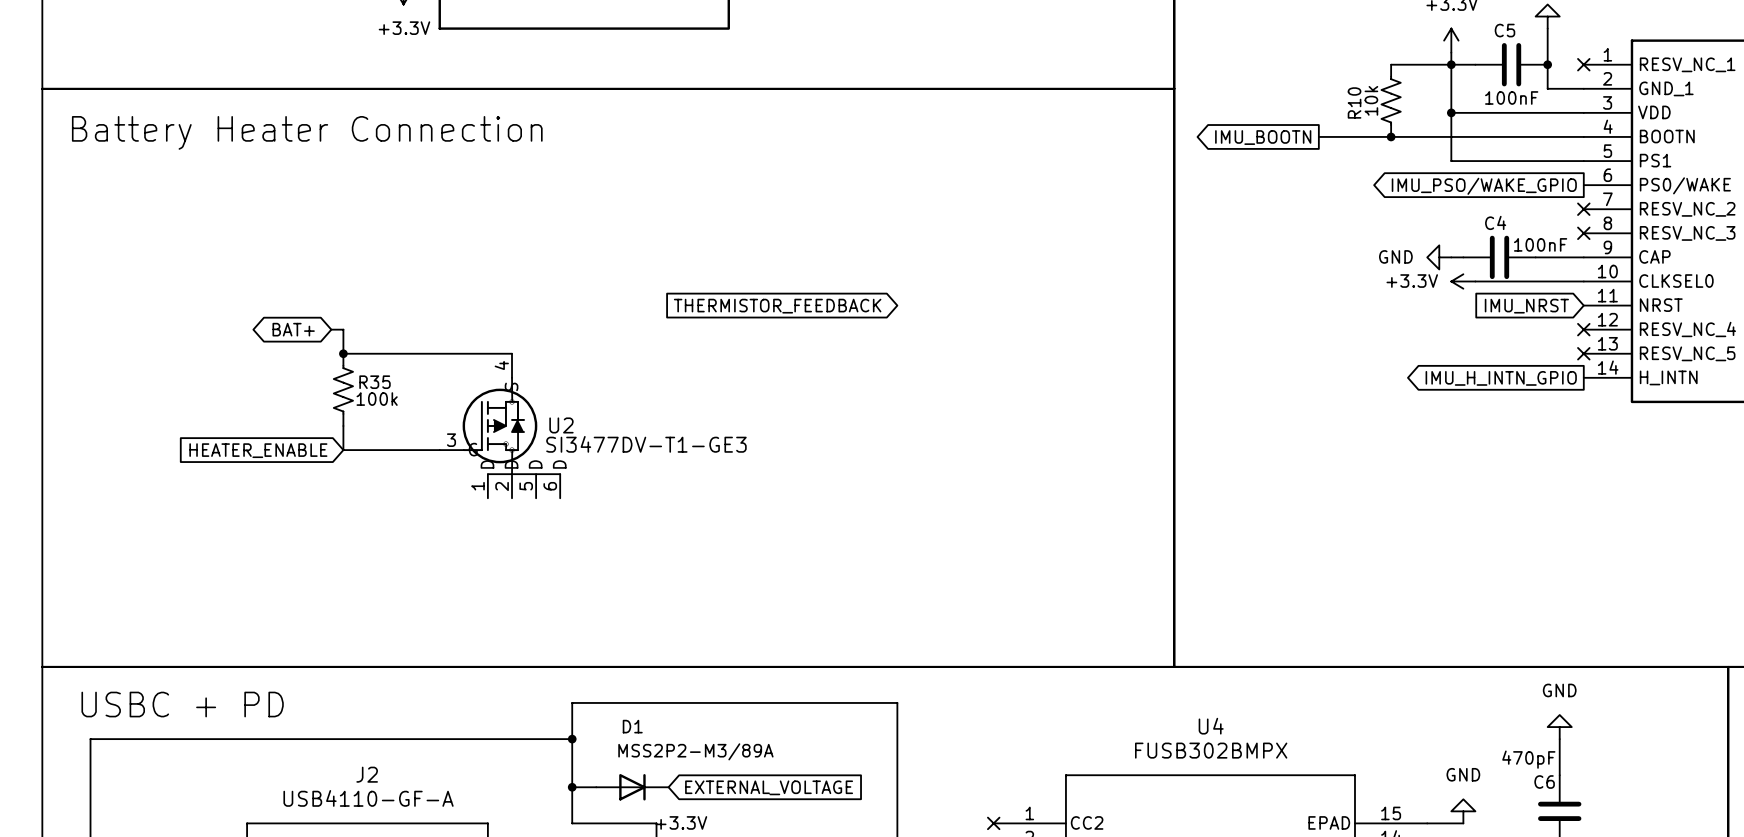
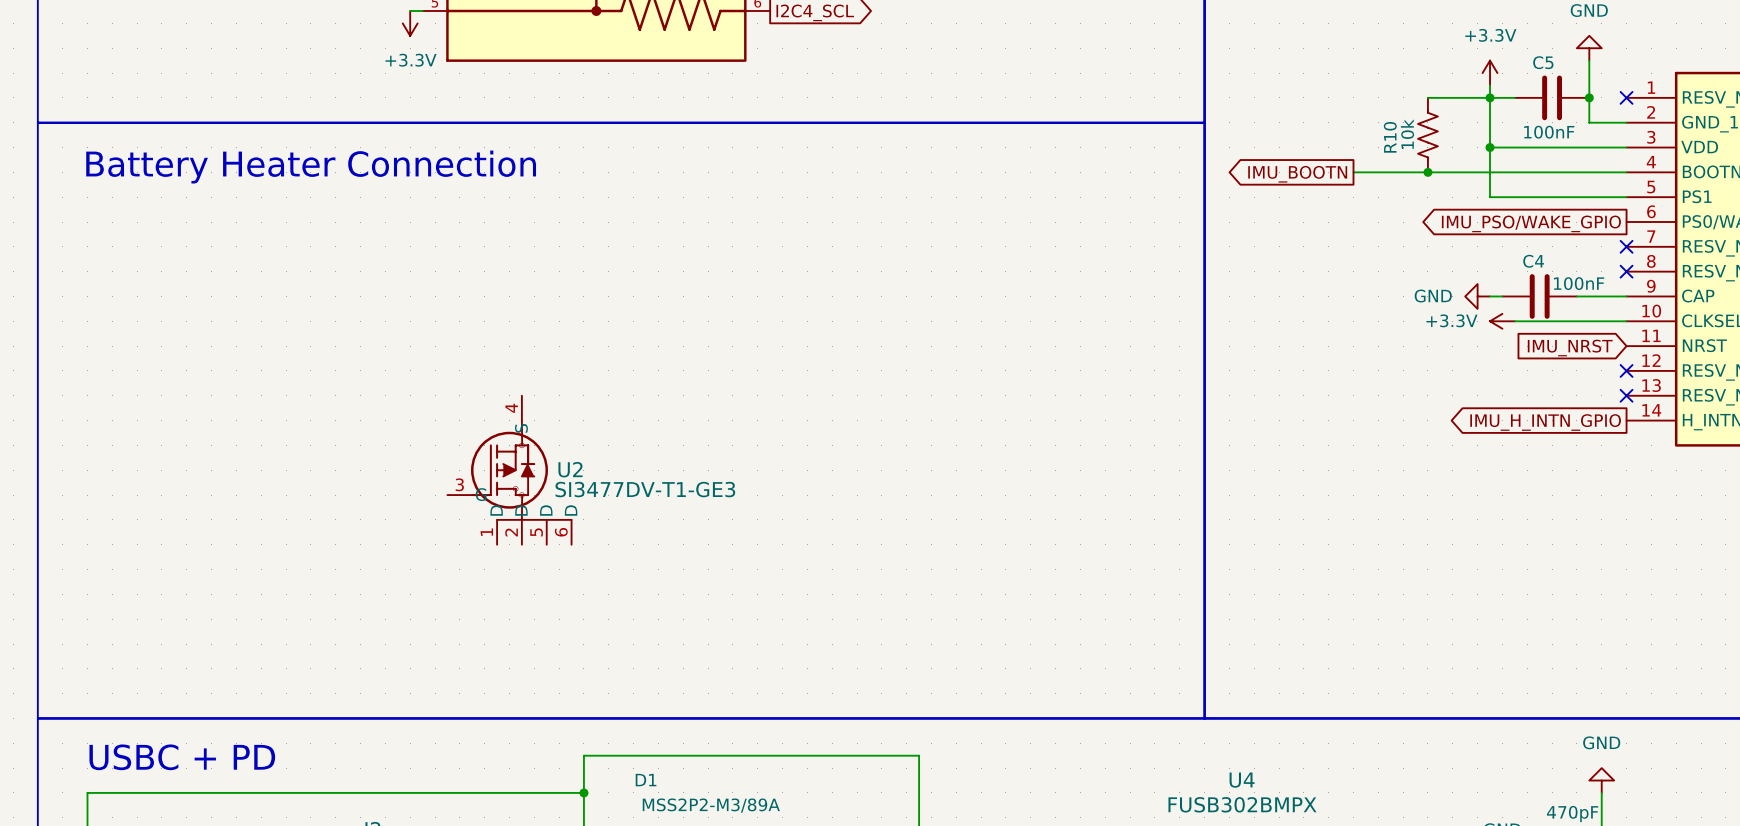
global label: THERMISTOR_FEEDBACK (777, 306) -> none
global label: BAT+ (293, 329) -> none
wire: (331, 329) (343, 329) (343, 353) (512, 353) -> none
junction: (343, 353) -> none
R35: 100k (343, 389) -> none
wire: (343, 425) (343, 450) (439, 450) -> none
global label: HEATER_ENABLE (258, 450) -> none

